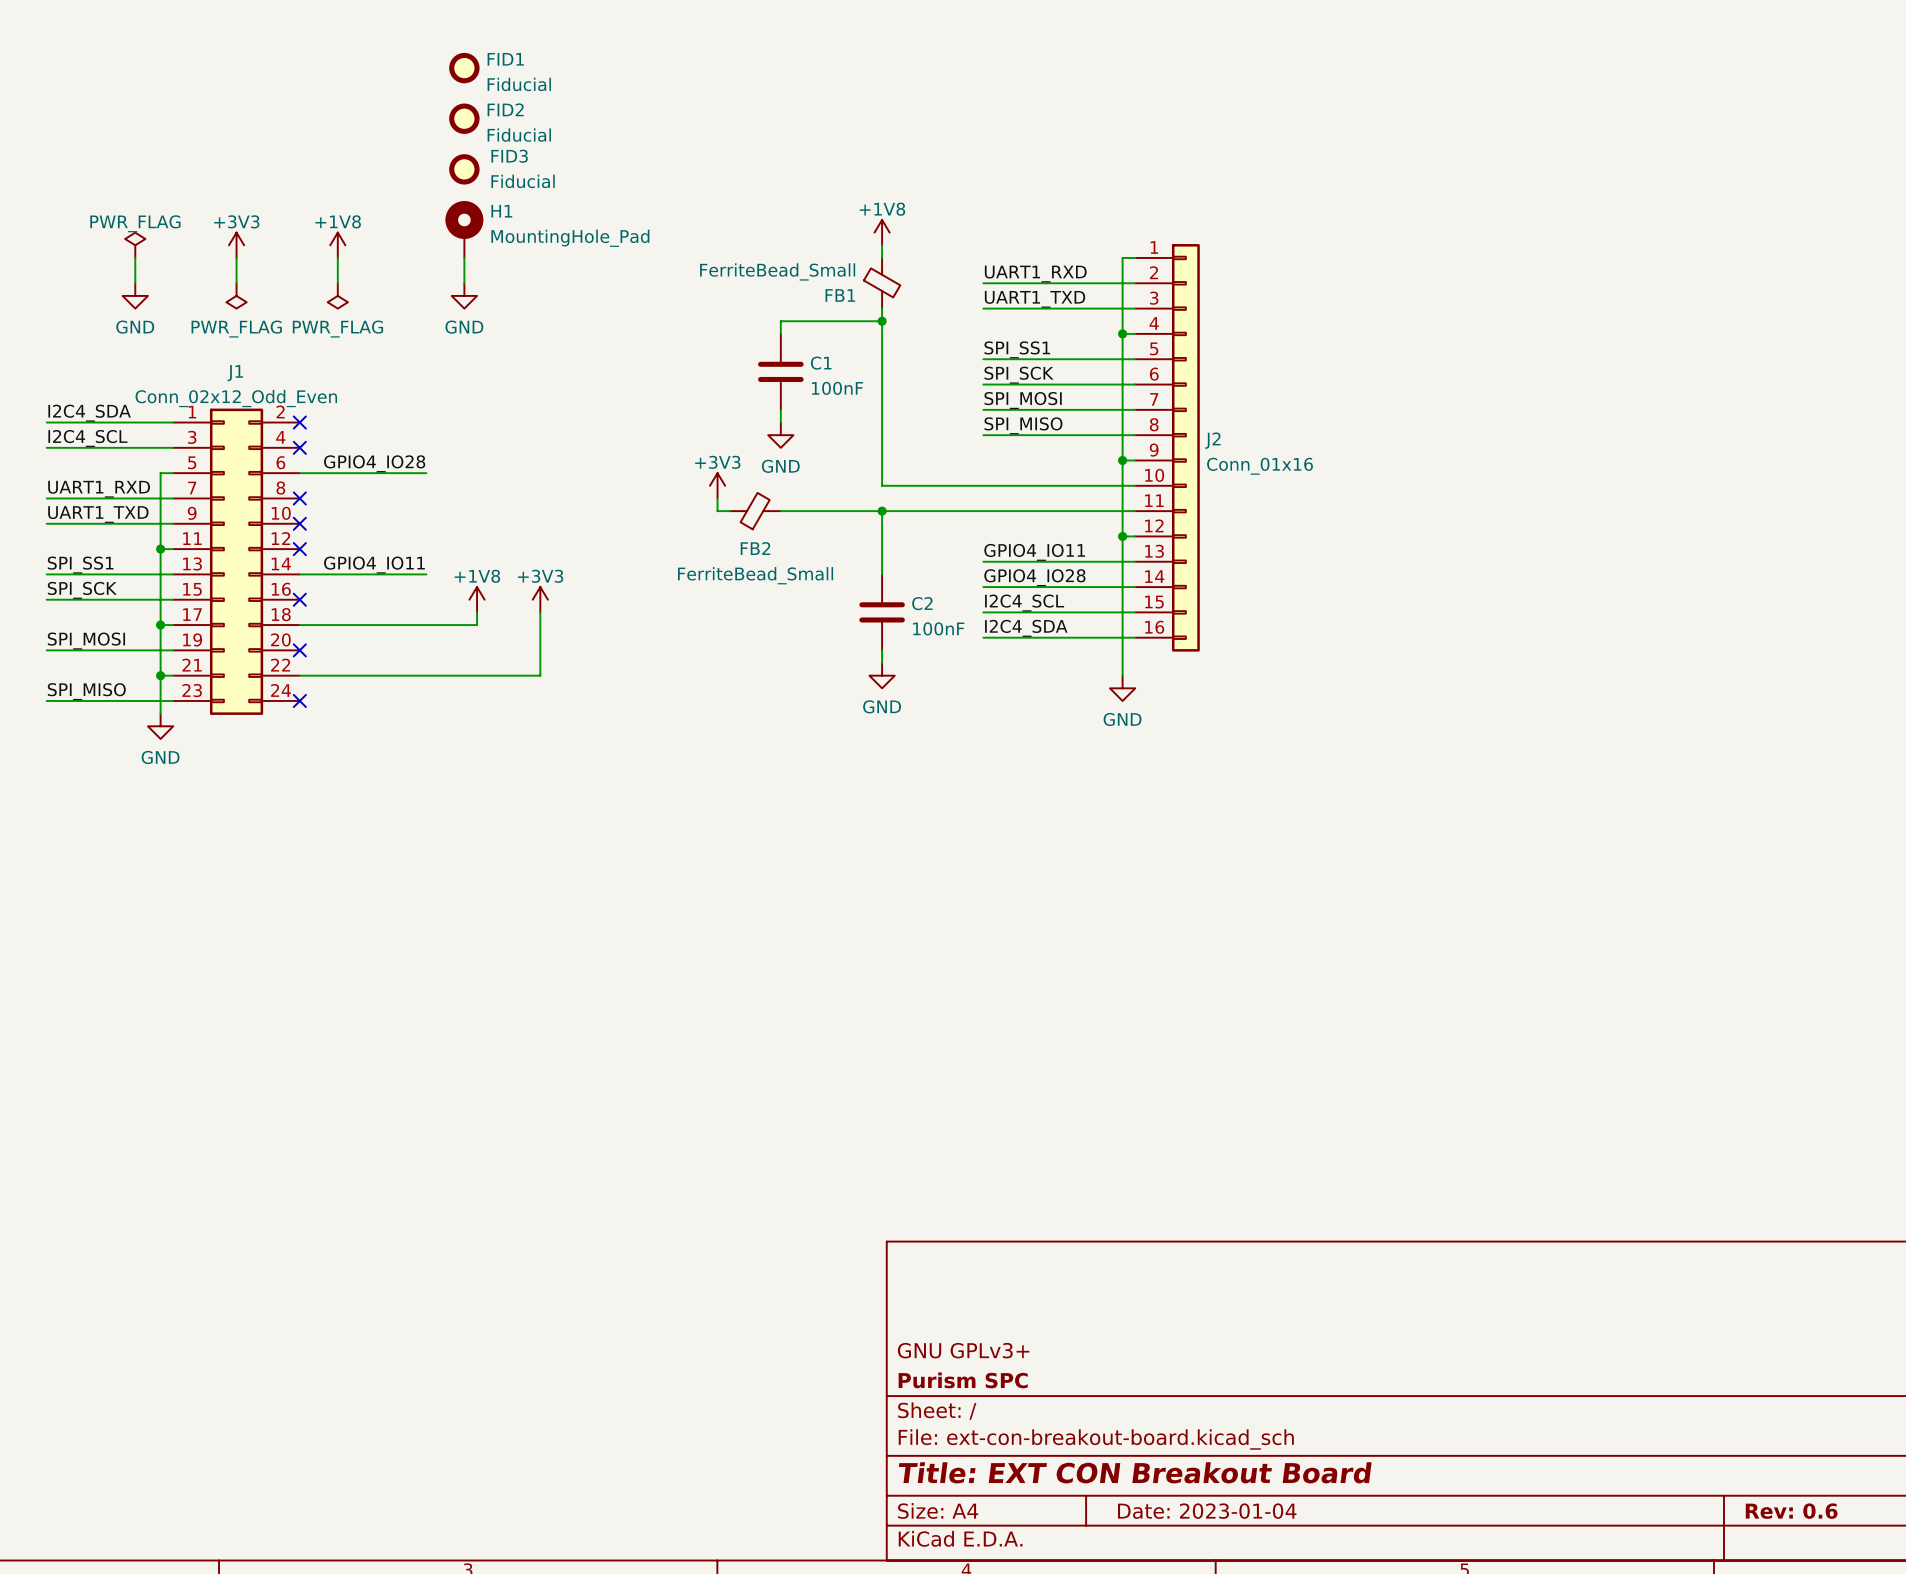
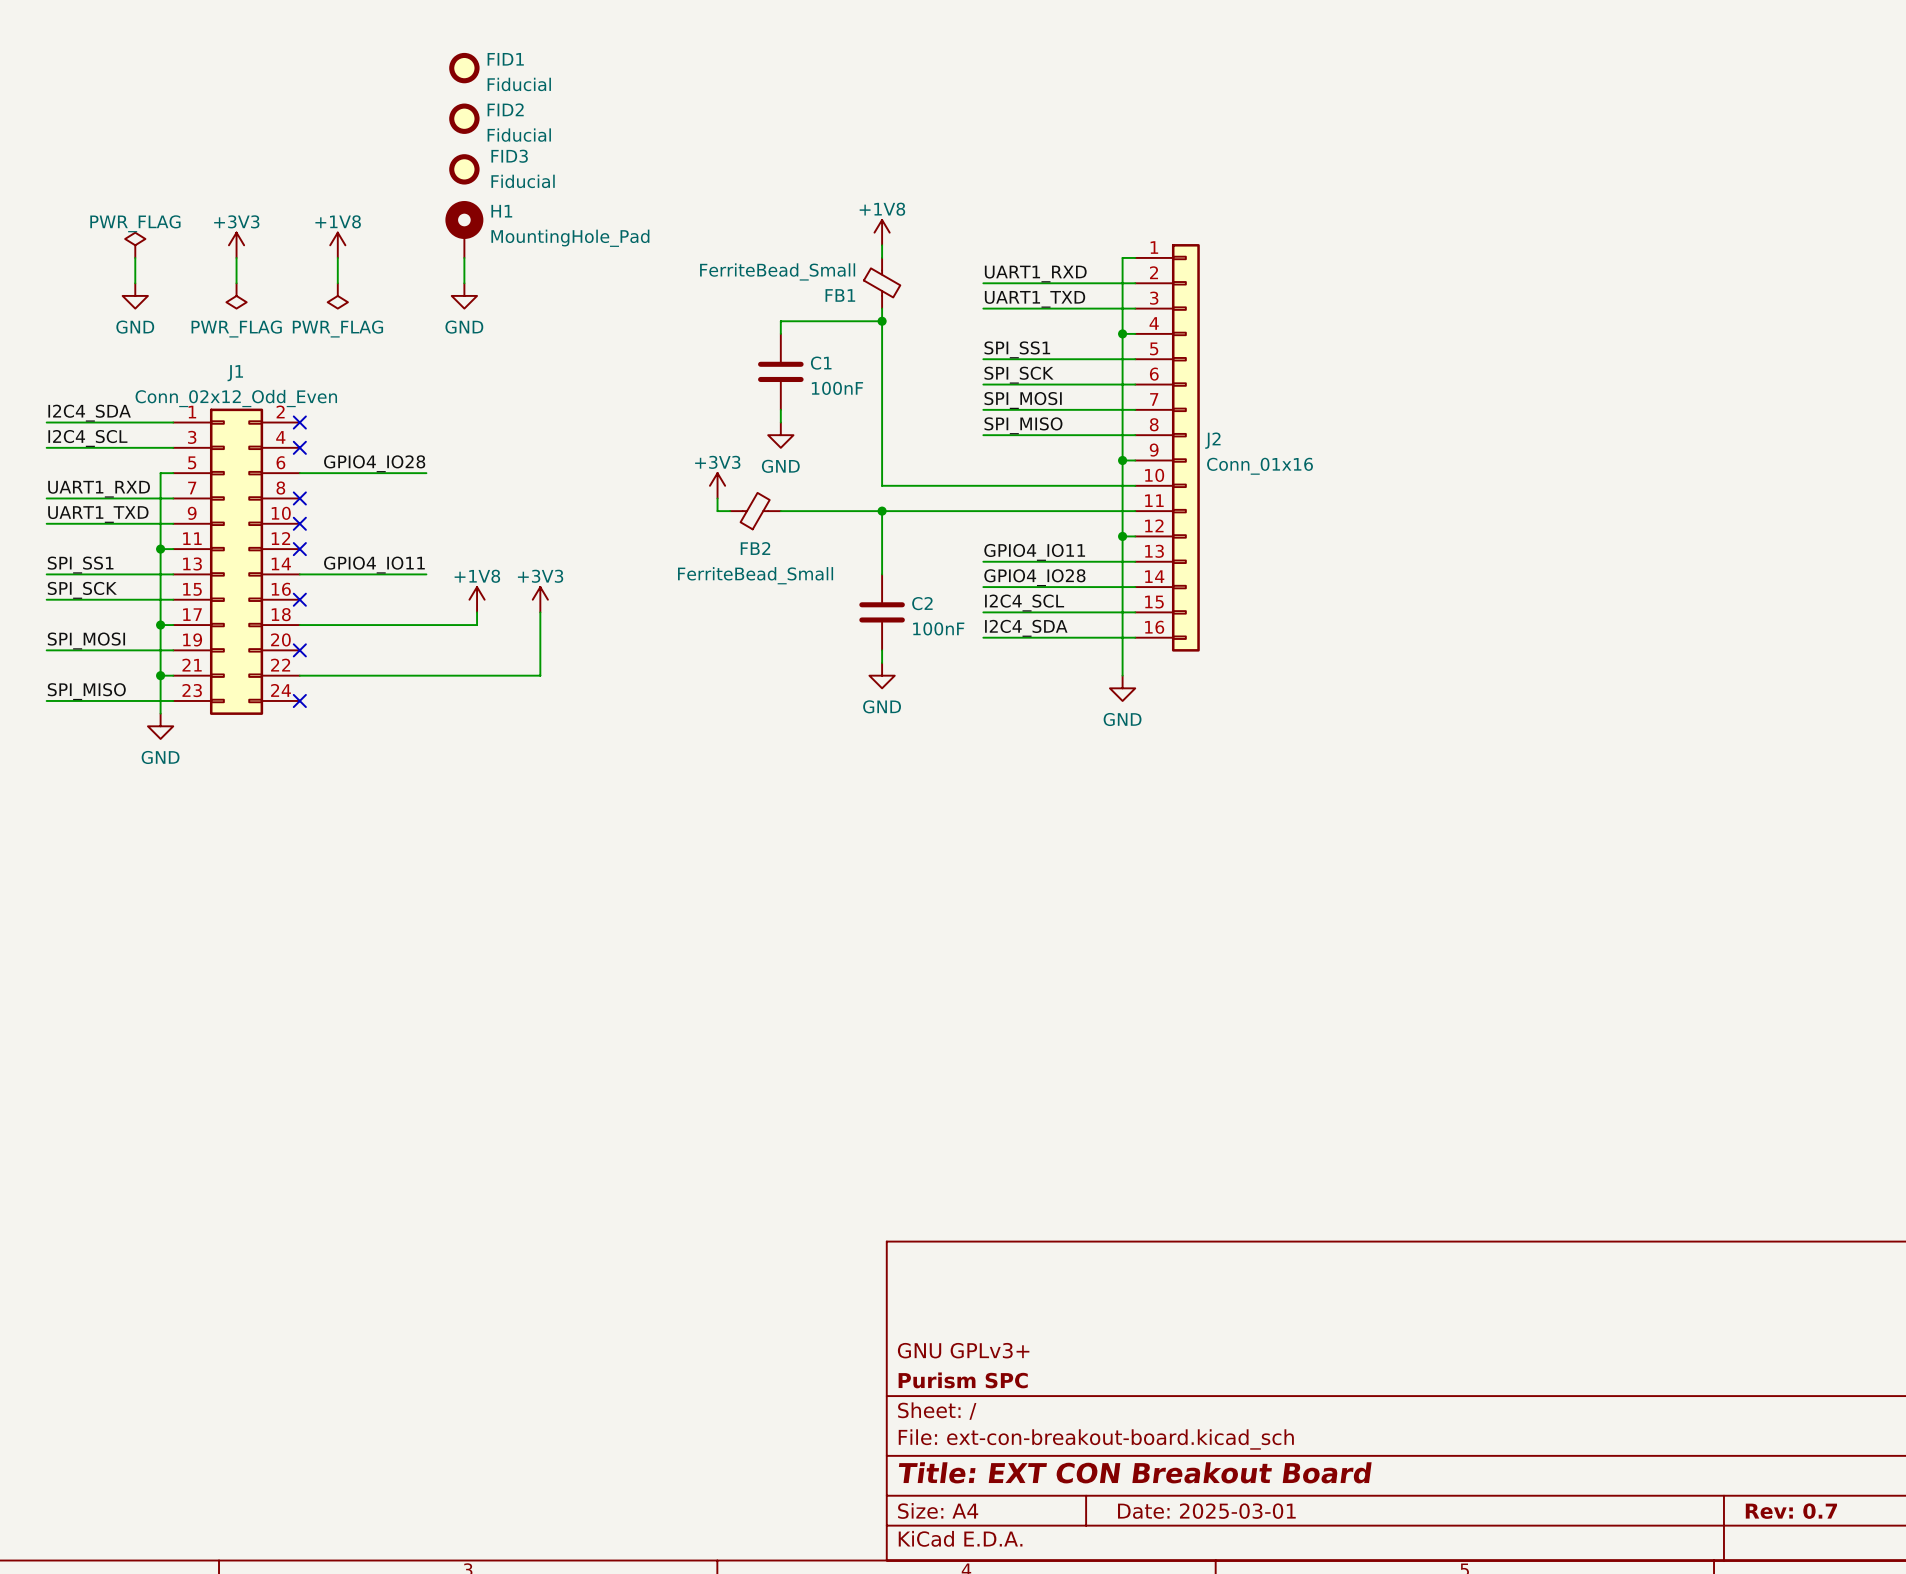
title block: Date: 2023-01-04 (1207, 1511) -> Date: 2025-03-01 (1206, 1511)
title block: Rev: 0.6 (1791, 1511) -> Rev: 0.7 (1791, 1511)

